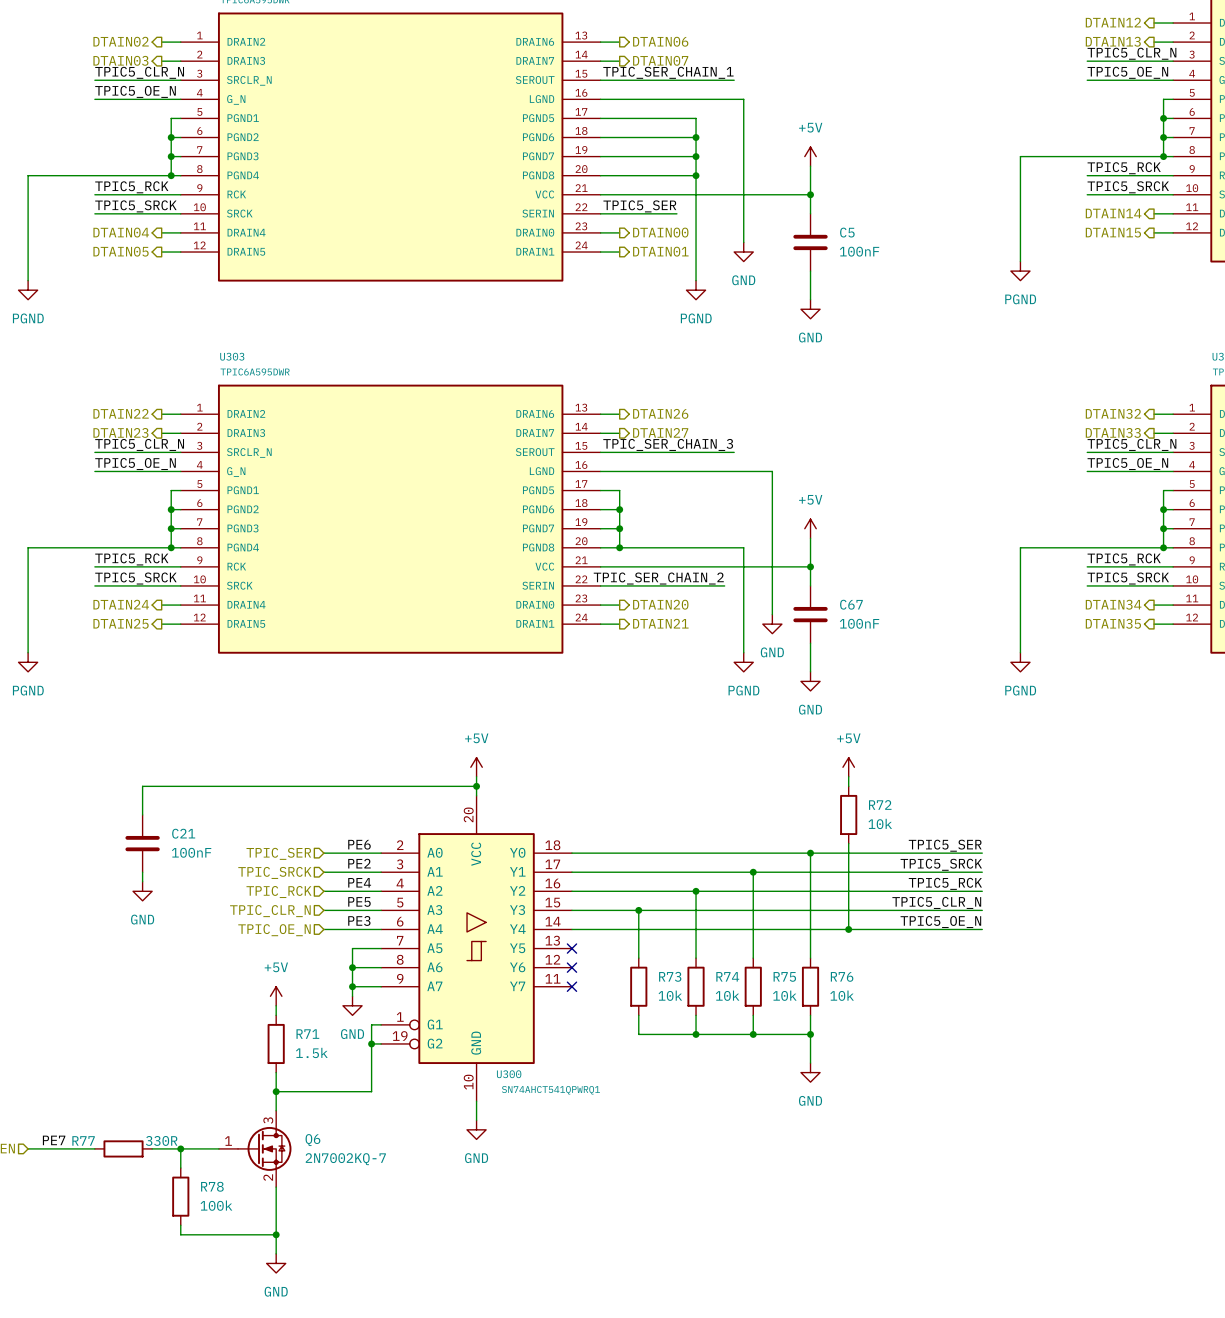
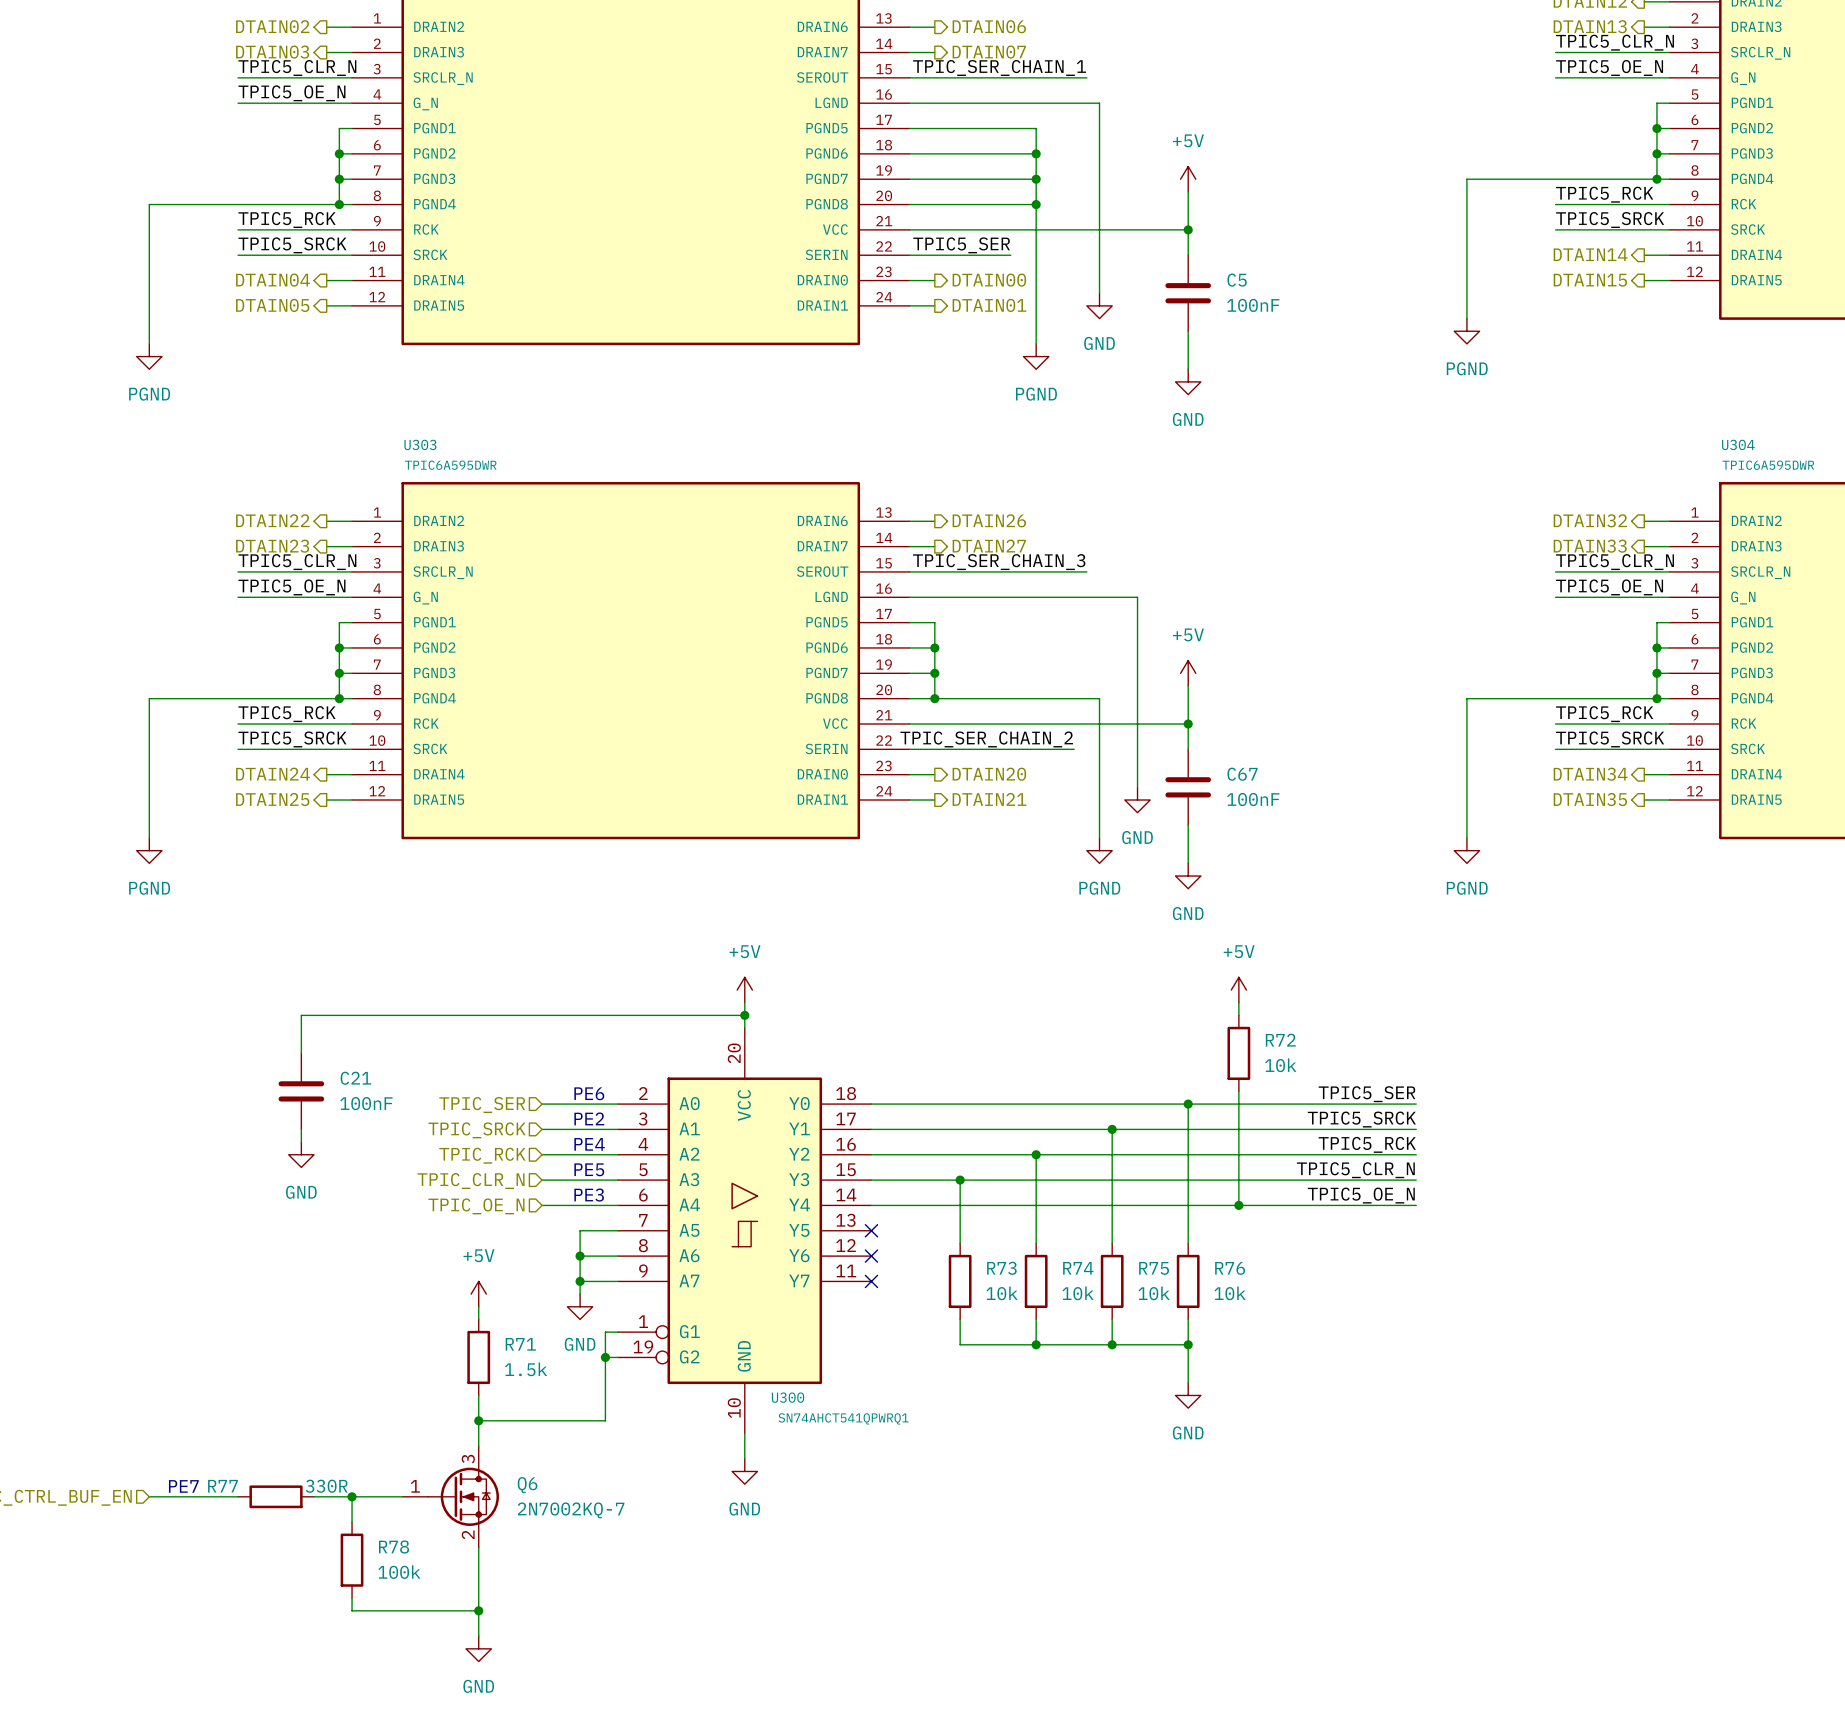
label: PE6 (359, 844) -> none
text: none -> PE6 (589, 1093)
label: PE2 (359, 863) -> none
text: none -> PE2 (589, 1118)
label: PE4 (359, 882) -> none
text: none -> PE4 (589, 1144)
label: PE5 (359, 901) -> none
text: none -> PE5 (589, 1169)
label: PE3 (359, 920) -> none
text: none -> PE3 (589, 1195)
label: PE7 (54, 1140) -> none
text: none -> PE7 (183, 1486)

